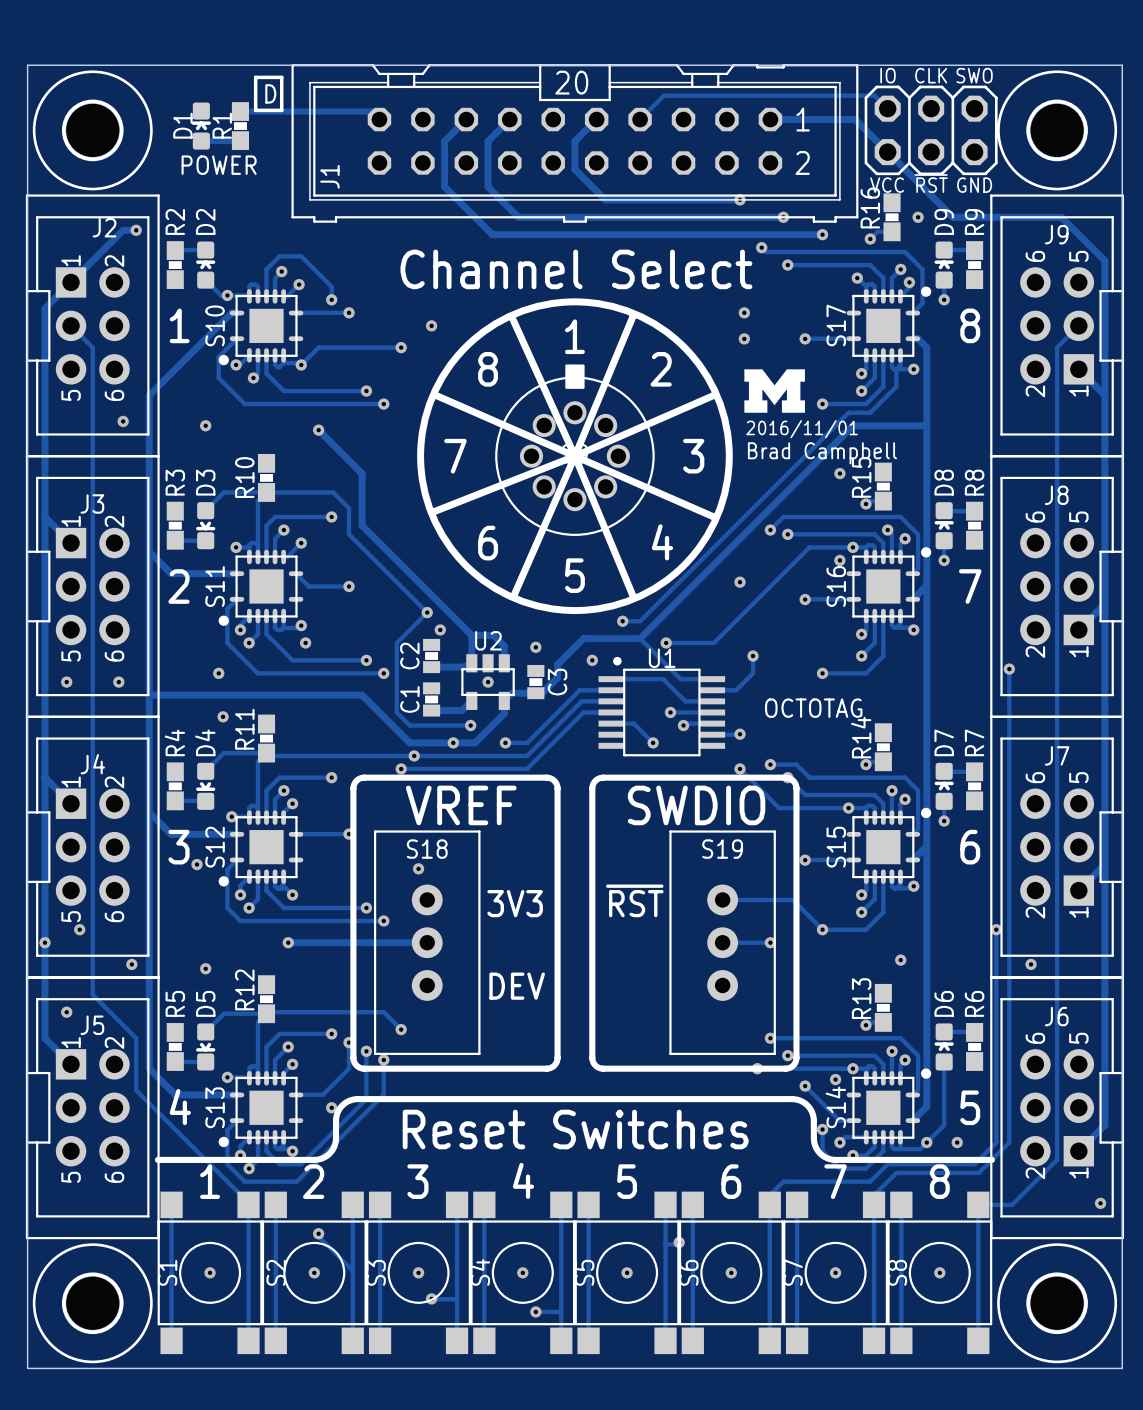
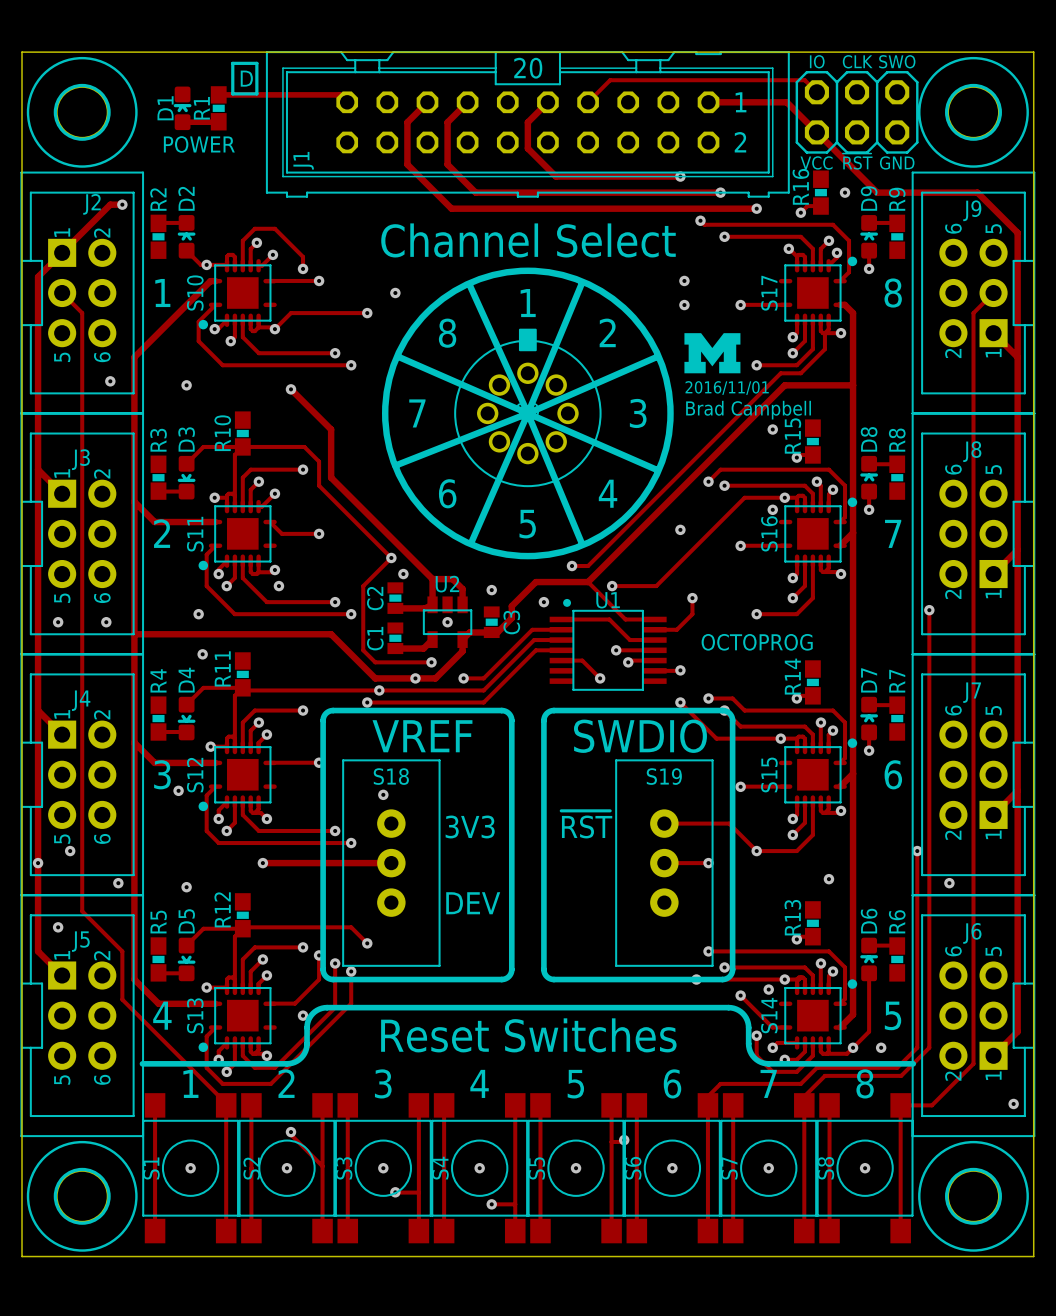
text: OCTOTAG (813, 708) -> OCTOPROG (757, 642)

